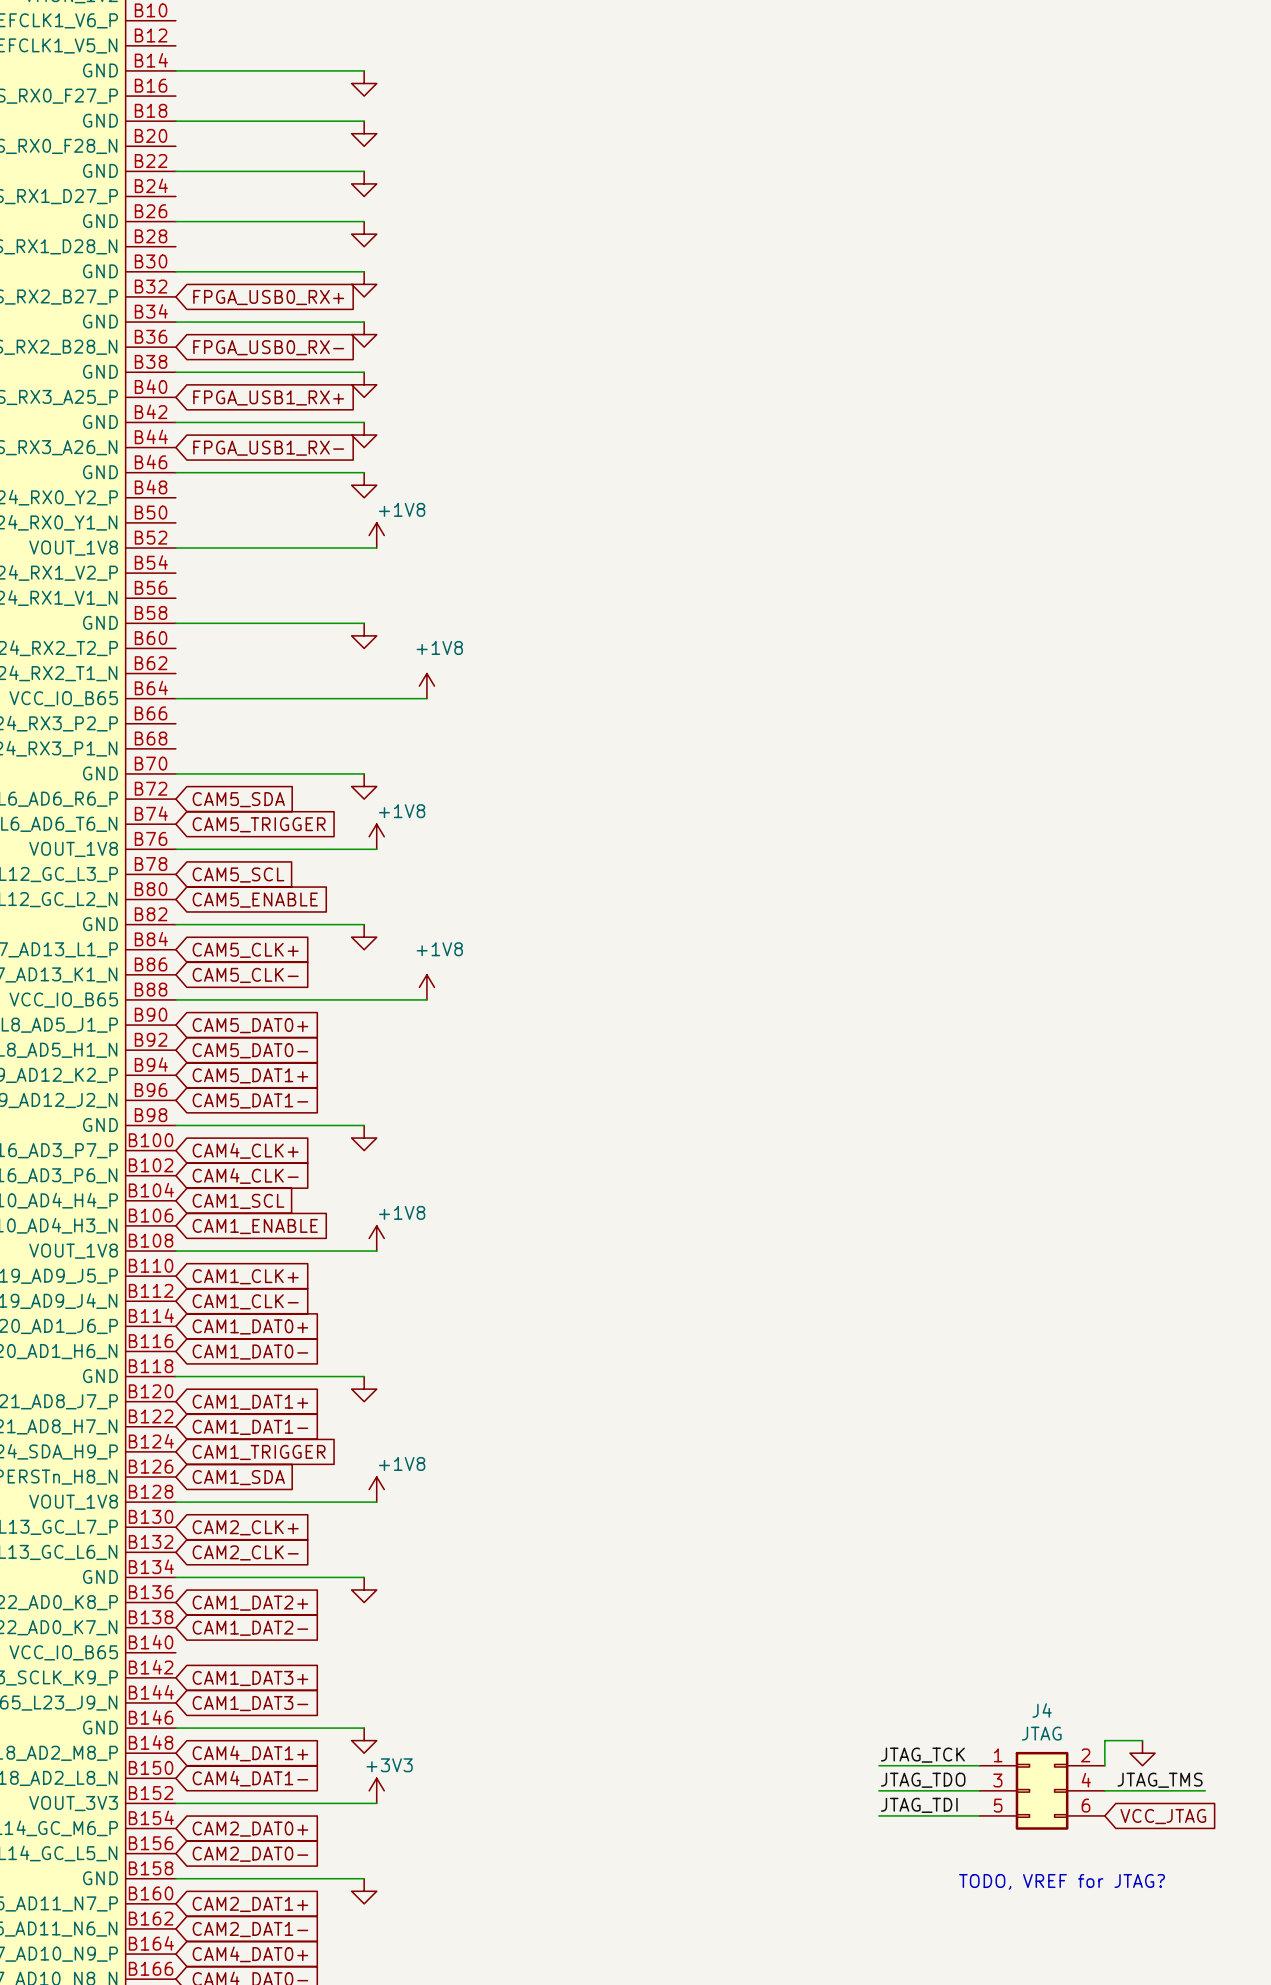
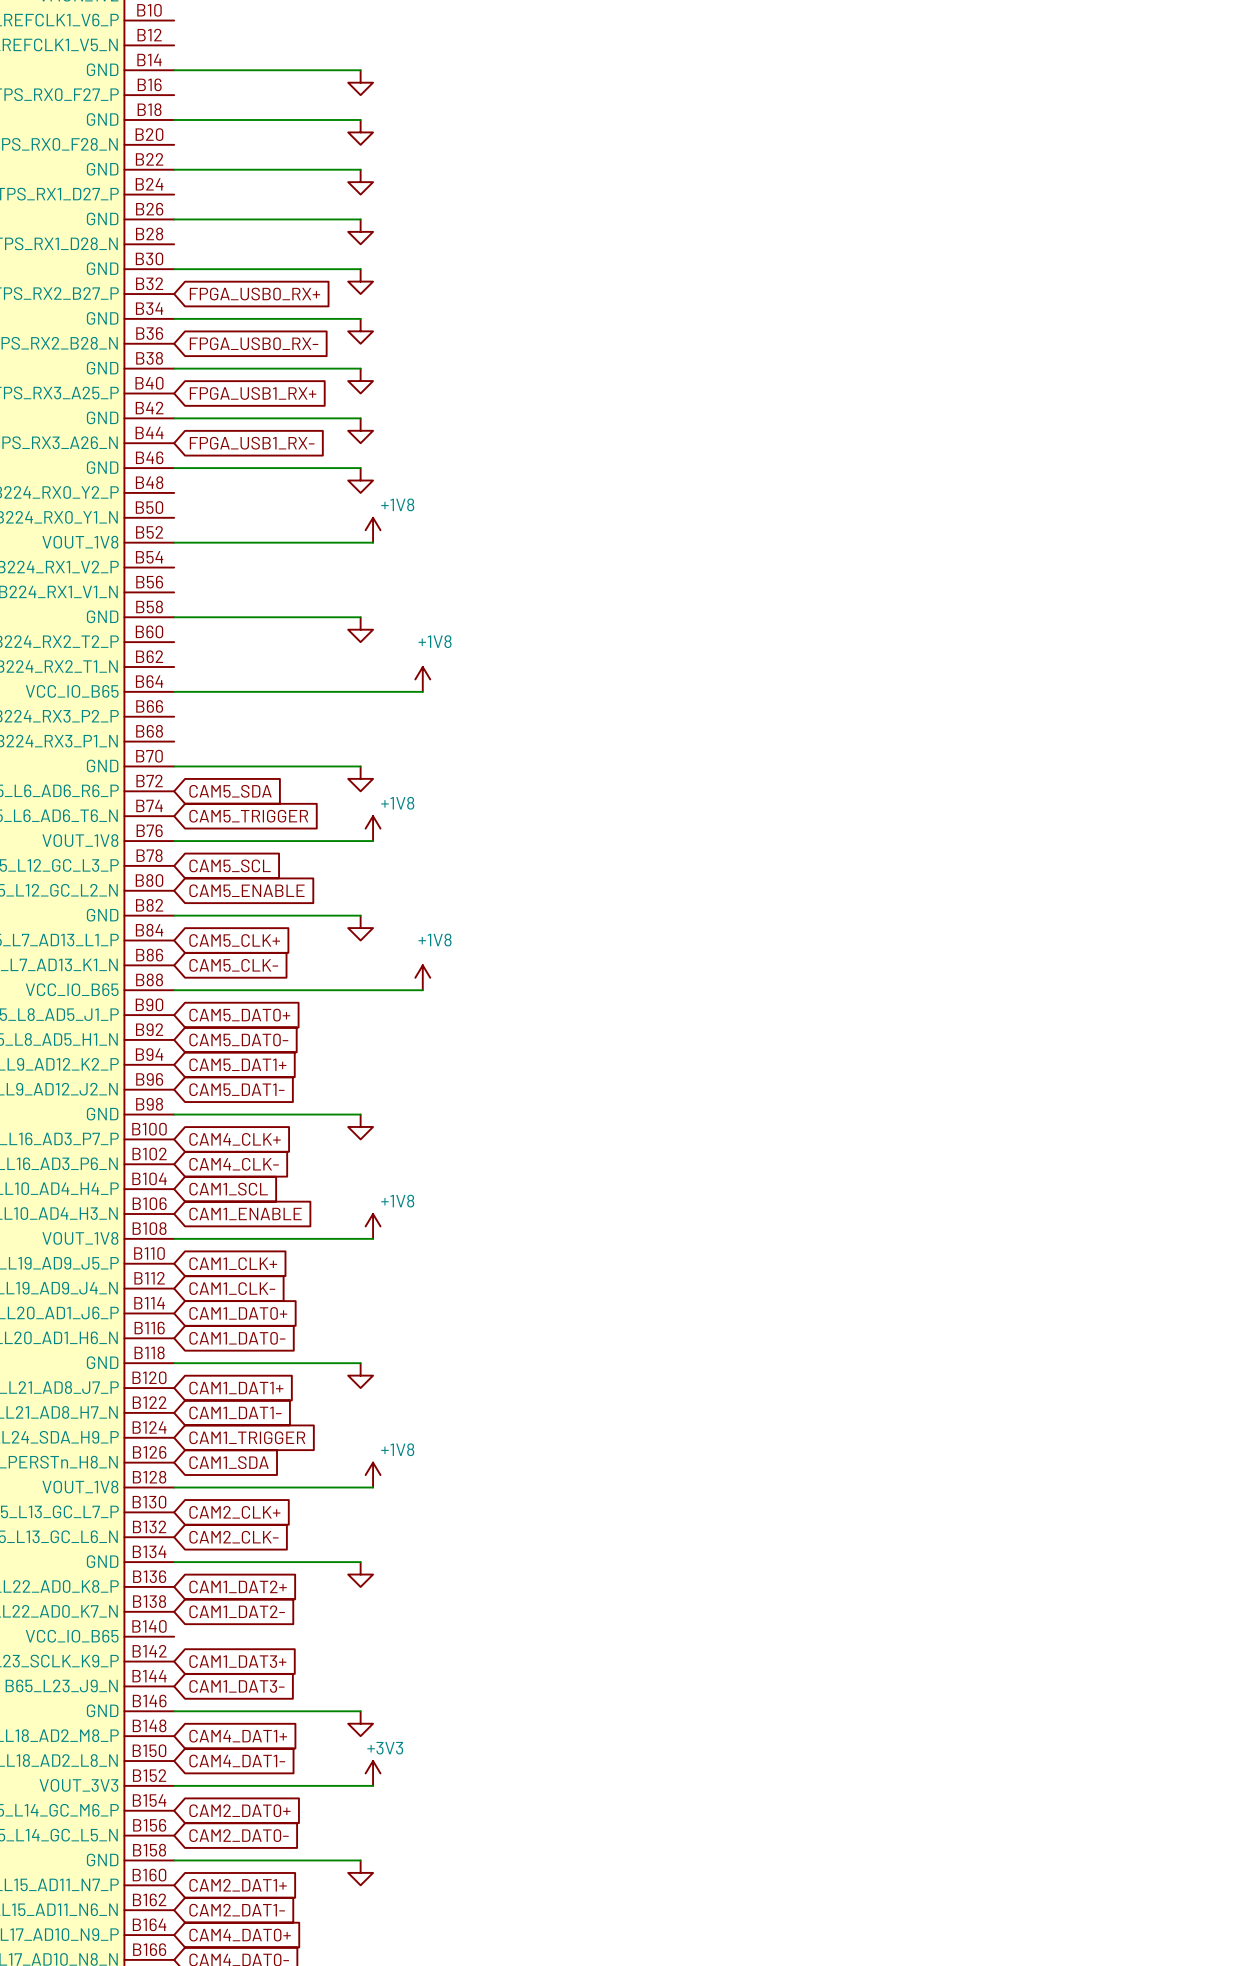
wire: (1142, 1740) (1104, 1740) (1104, 1765) -> none
power symbol: (1142, 1753) -> none
label: JTAG_TCK (922, 1755) -> none
wire: (878, 1765) (979, 1765) -> none
label: JTAG_TDO (923, 1780) -> none
label: JTAG_TMS (1160, 1780) -> none
wire: (878, 1790) (979, 1790) -> none
J4: JTAG (1042, 1790) -> none
wire: (1104, 1790) (1205, 1790) -> none
label: JTAG_TDI (919, 1805) -> none
wire: (878, 1815) (979, 1815) -> none
global label: VCC_JTAG (1163, 1816) -> none
text: TODO, VREF for JTAG? (1062, 1881) -> none

